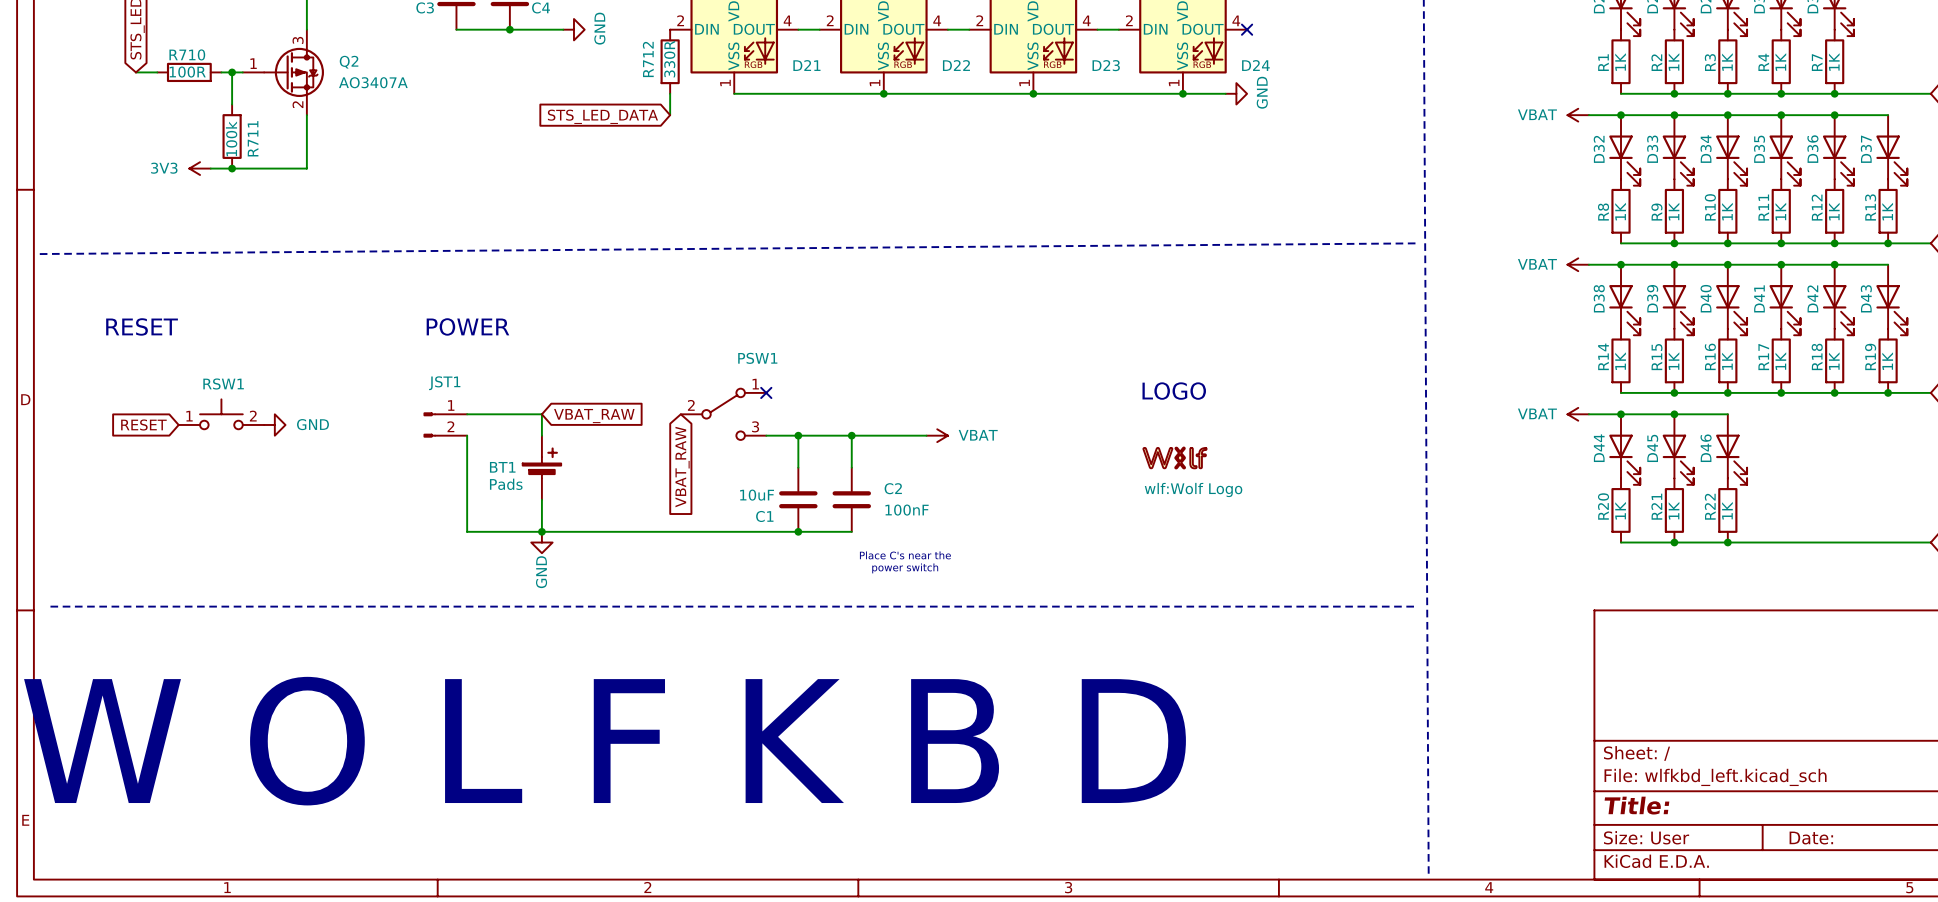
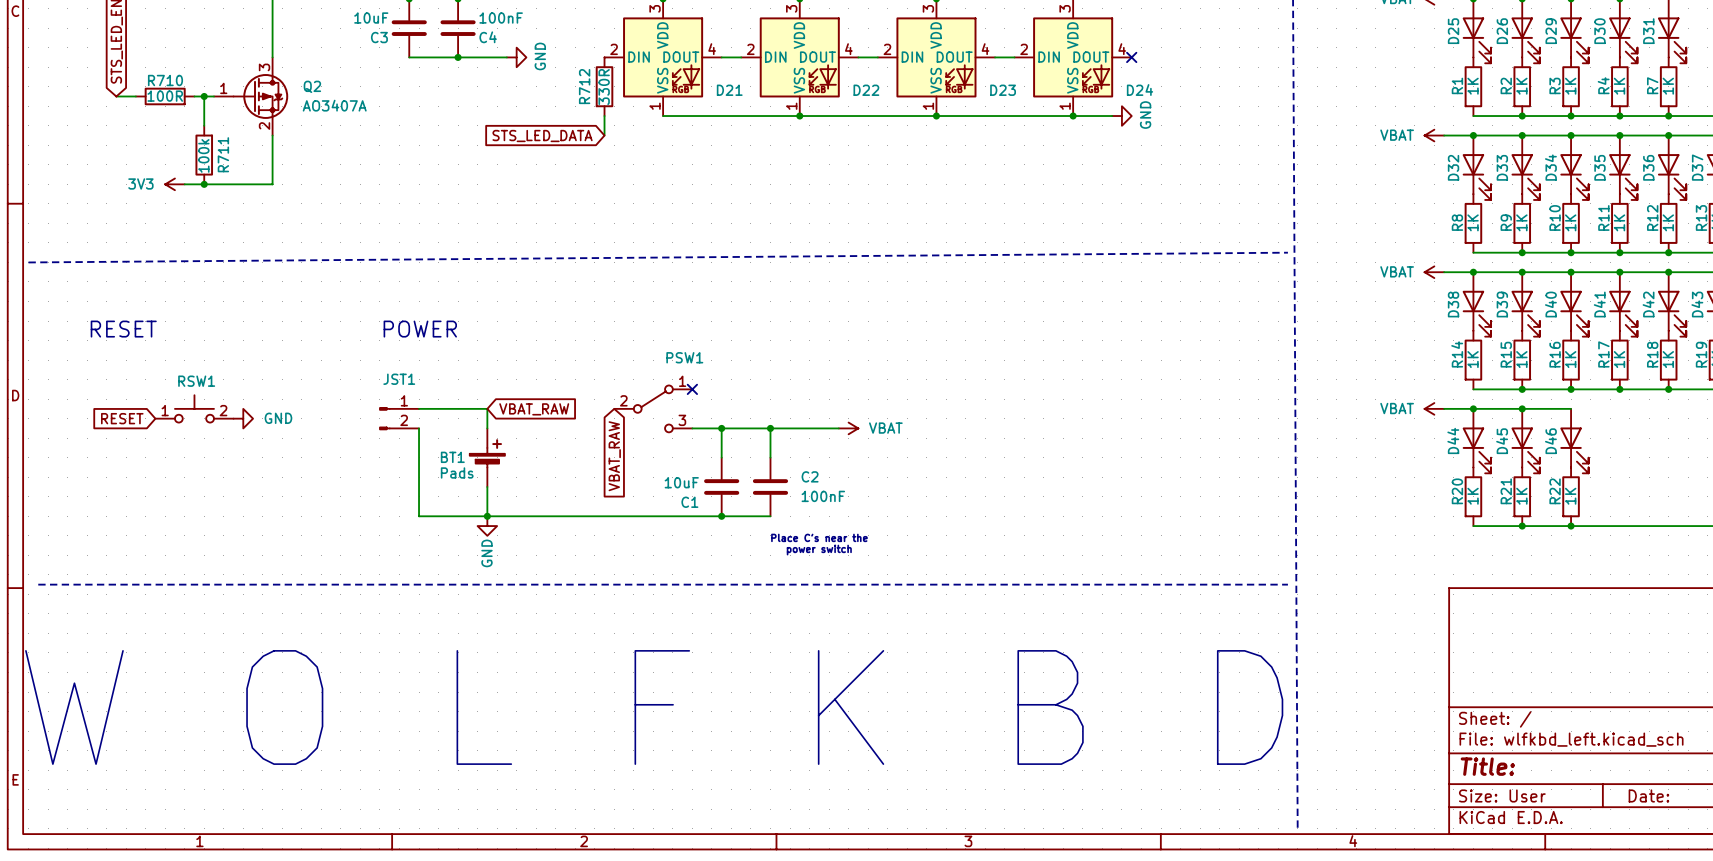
text: LOGO (1174, 391) -> none
part: (1175, 458) -> none

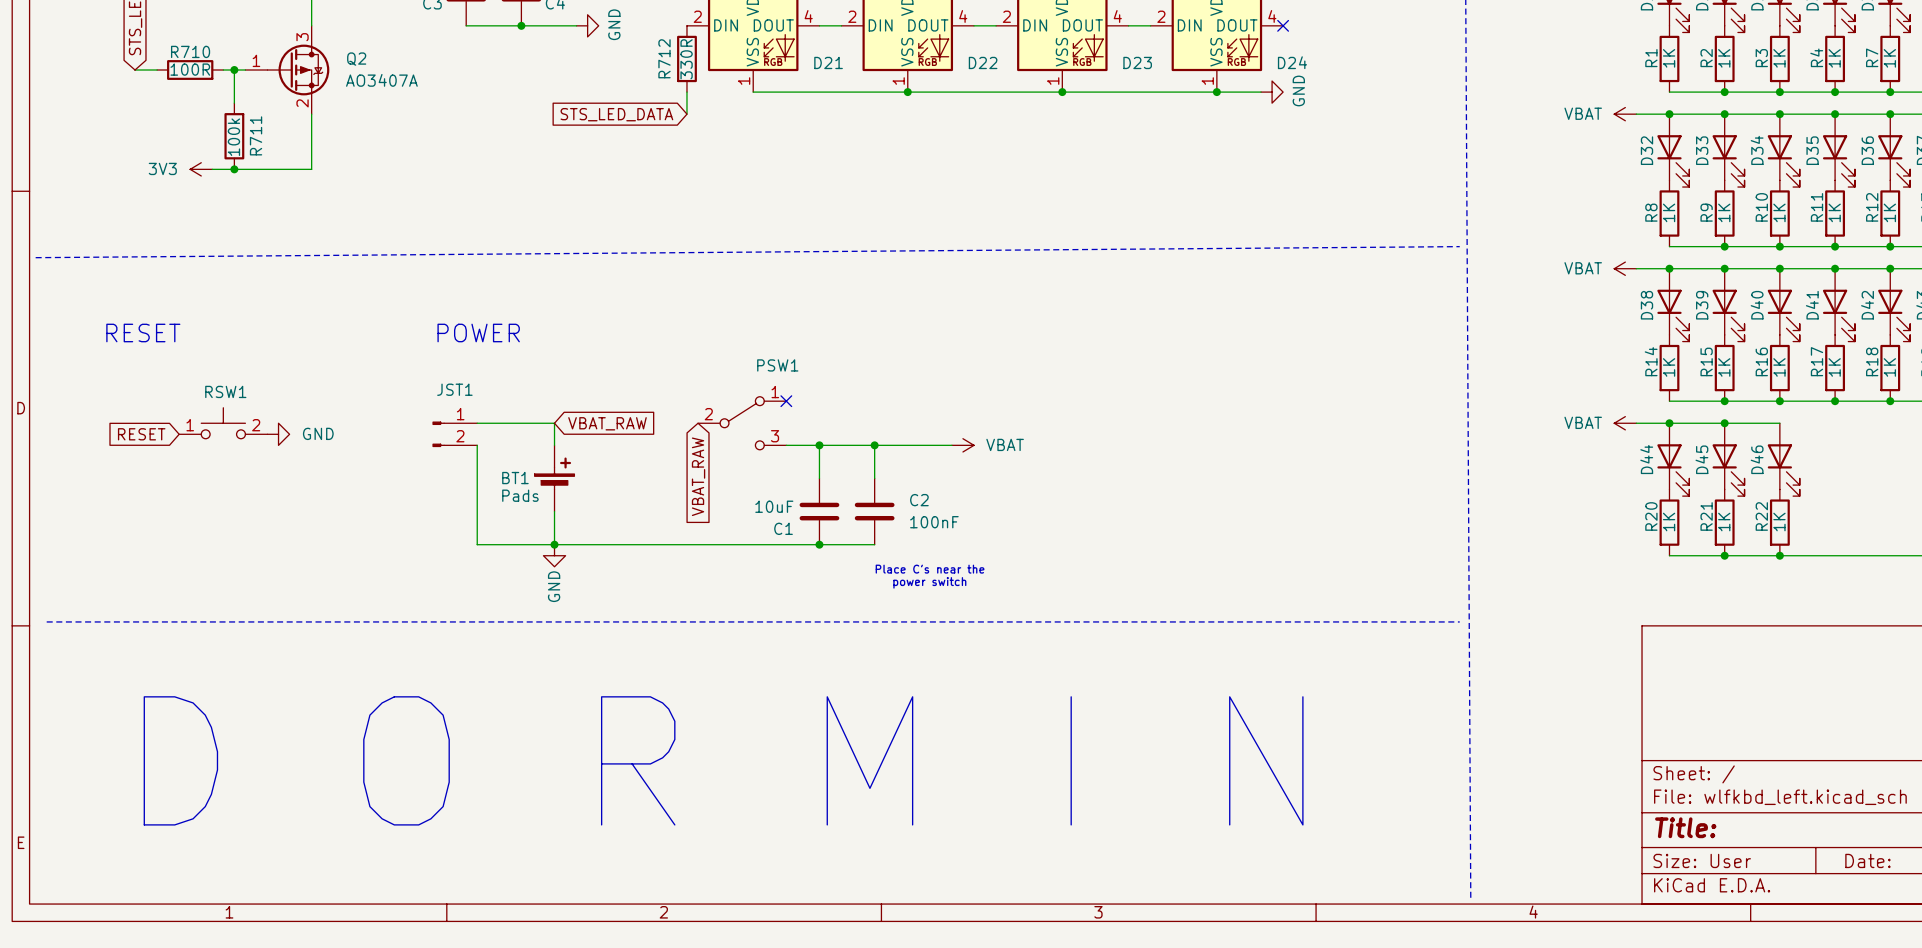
text: none -> D O R M I N (723, 760)
text: W O L F K B D (654, 707) -> none

